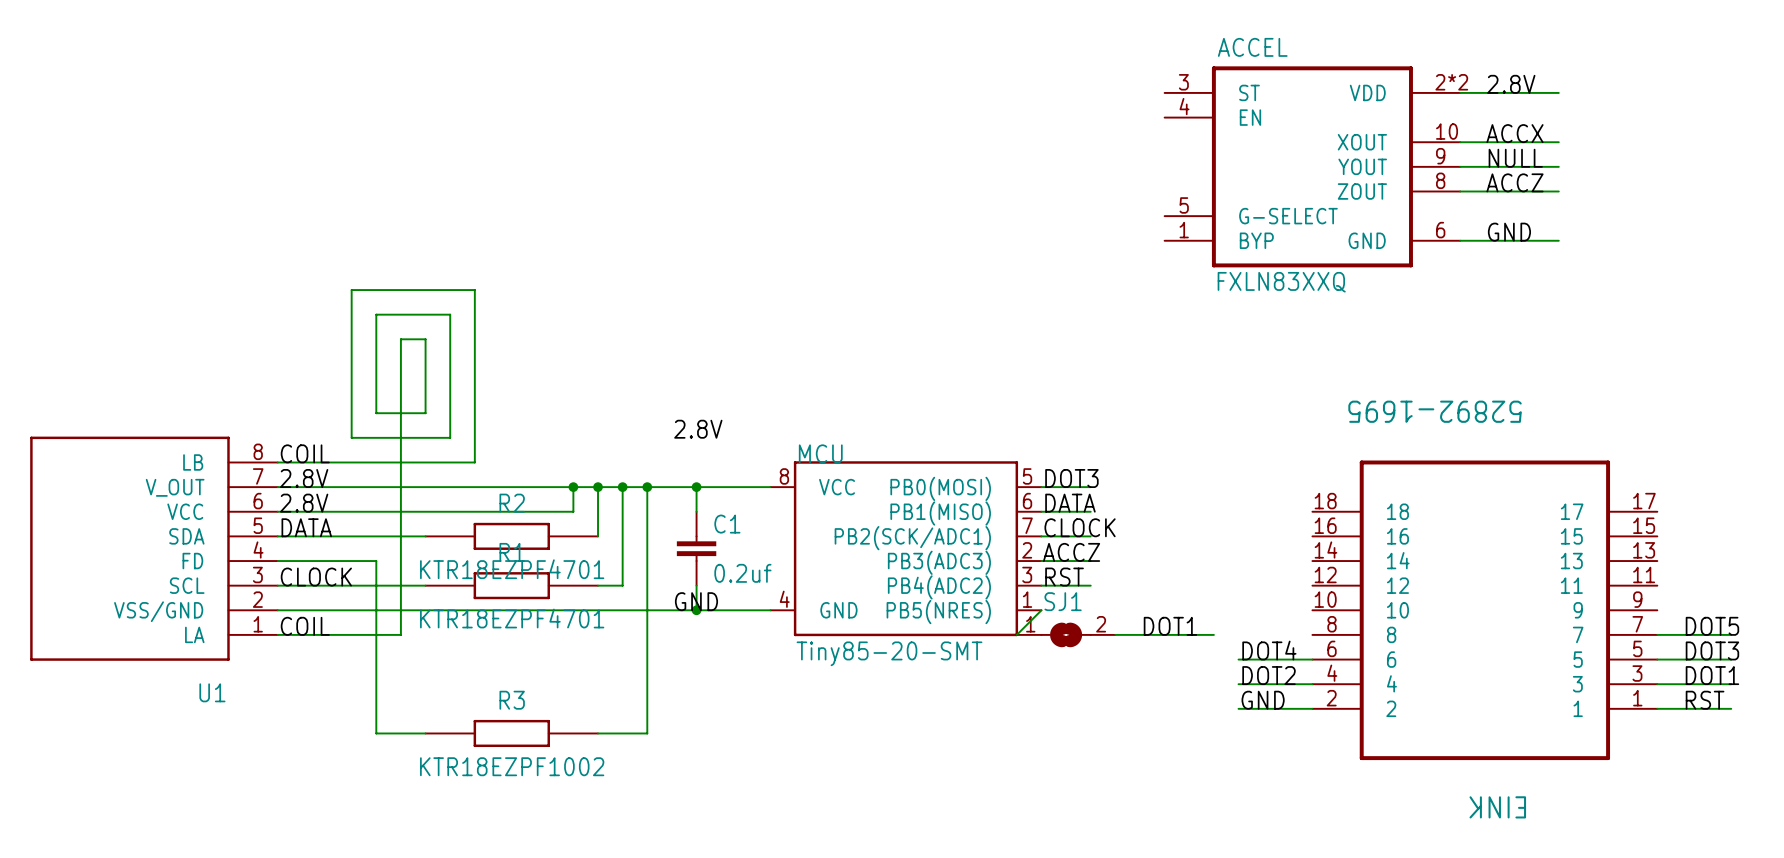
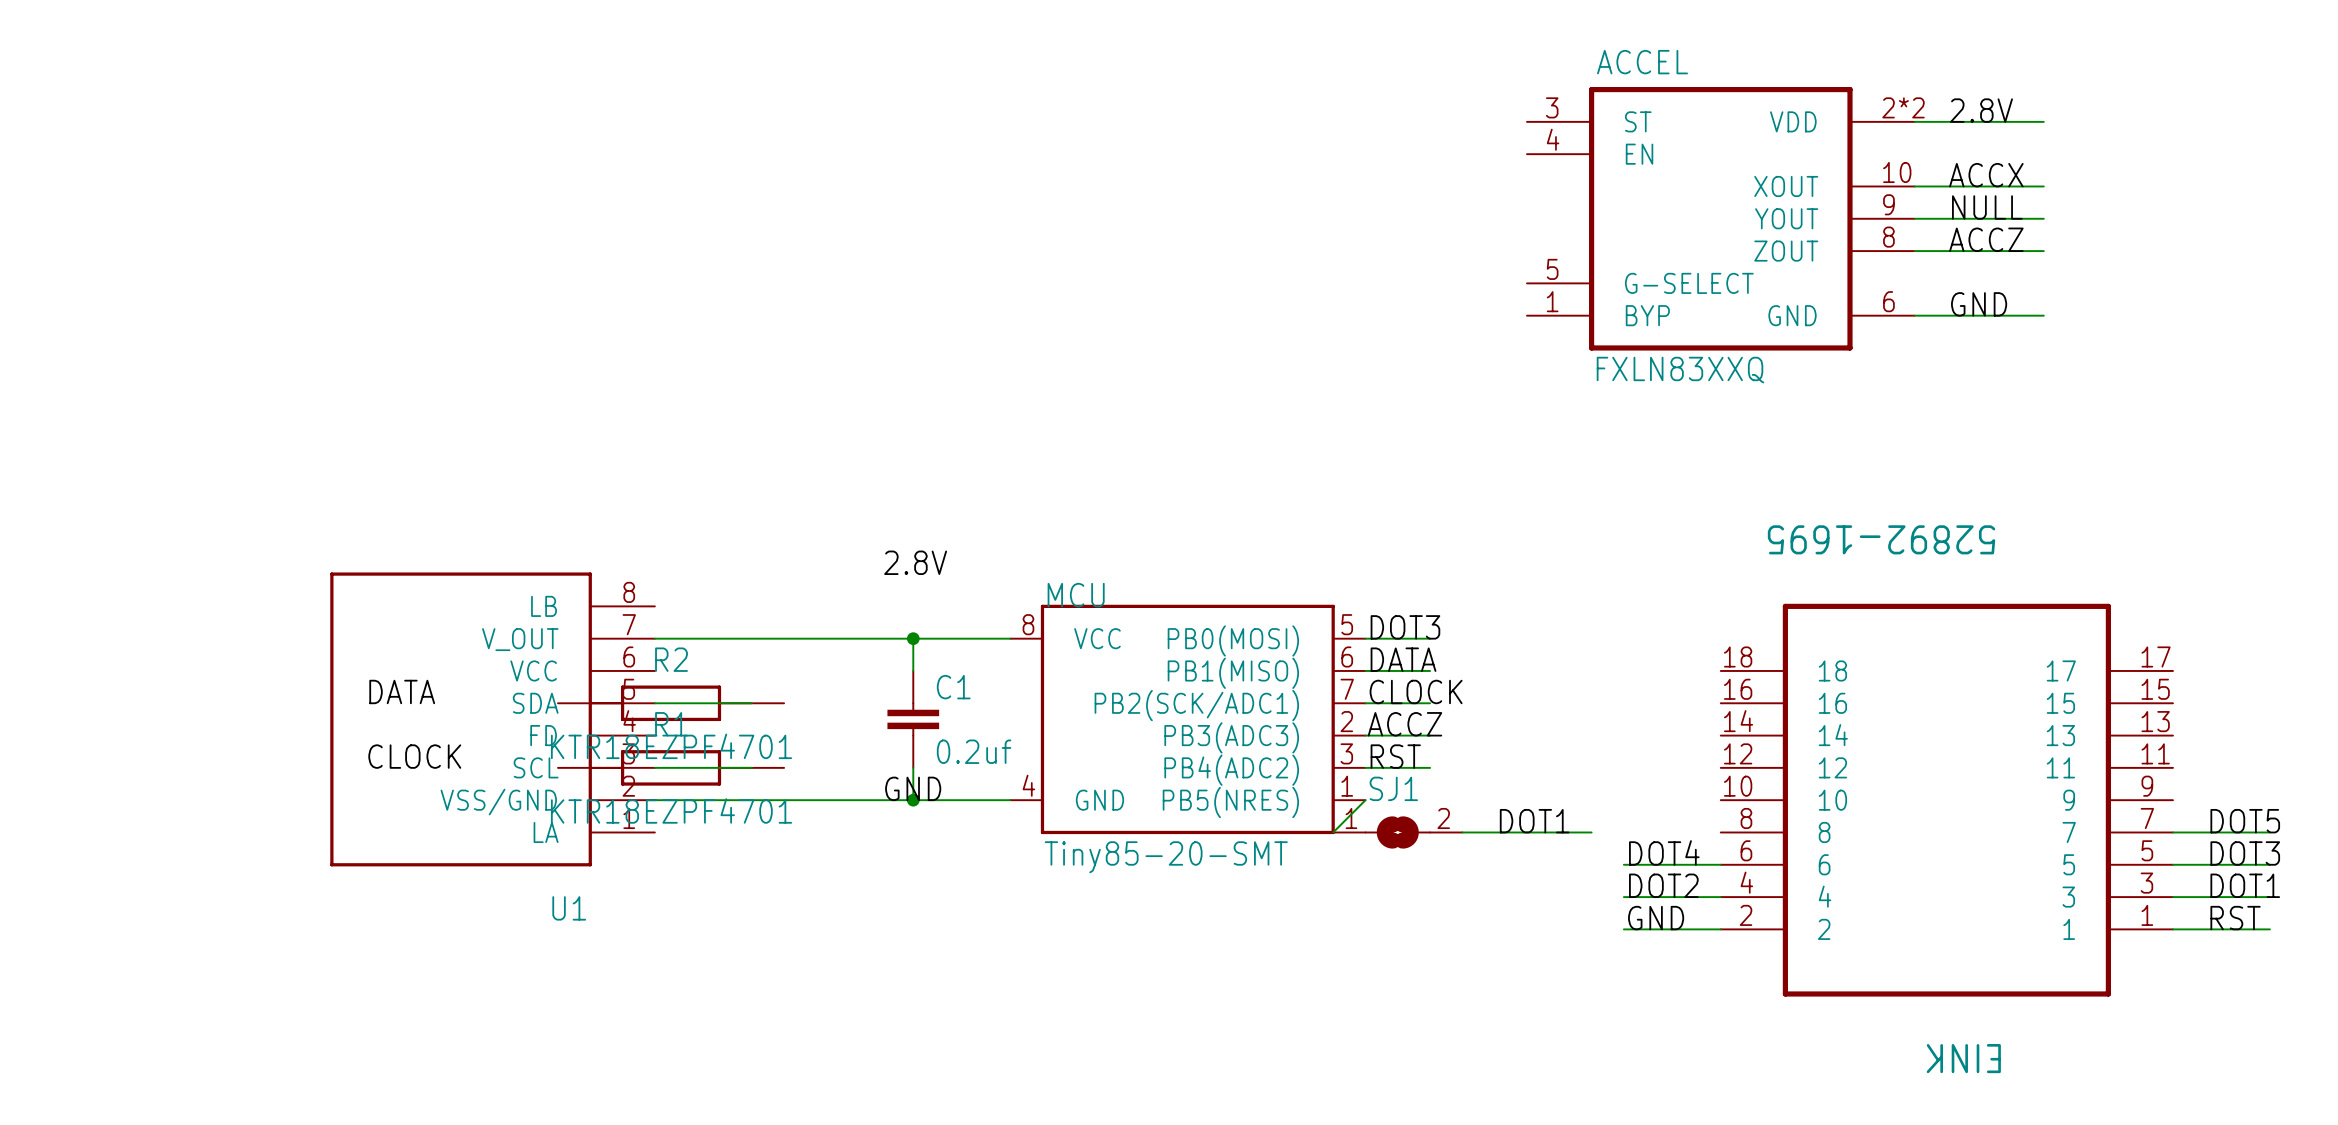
label: COIL (305, 453) -> none
wire: (277, 462) (474, 462) (474, 290) (351, 290) (351, 437) (450, 437) (450, 314) (376, 314) (376, 413) (425, 413) (425, 339) (400, 339) (400, 634) (277, 634) -> none
label: 2.8V (304, 478) -> none
wire: (277, 487) (499, 487) -> none
wire: (573, 487) (573, 511) (277, 511) -> none
junction: (573, 487) -> none
wire: (598, 487) (598, 536) -> none
junction: (598, 487) -> none
wire: (622, 487) (622, 585) (598, 585) -> none
junction: (622, 487) -> none
wire: (647, 487) (647, 733) (598, 733) -> none
junction: (647, 487) -> none
label: 2.8V (304, 503) -> none
wire: (277, 536) (425, 536) -> none
wire: none -> (654, 703) (751, 703)
U1 position: (153, 548) -> (492, 719)
wire: (277, 561) (376, 561) (376, 733) (425, 733) -> none
wire: (277, 585) (425, 585) -> none
wire: none -> (654, 767) (751, 767)
wire: (277, 610) (499, 610) -> none
label: COIL (305, 626) -> none
R3: KTR18EZPF1002 (511, 733) -> none

